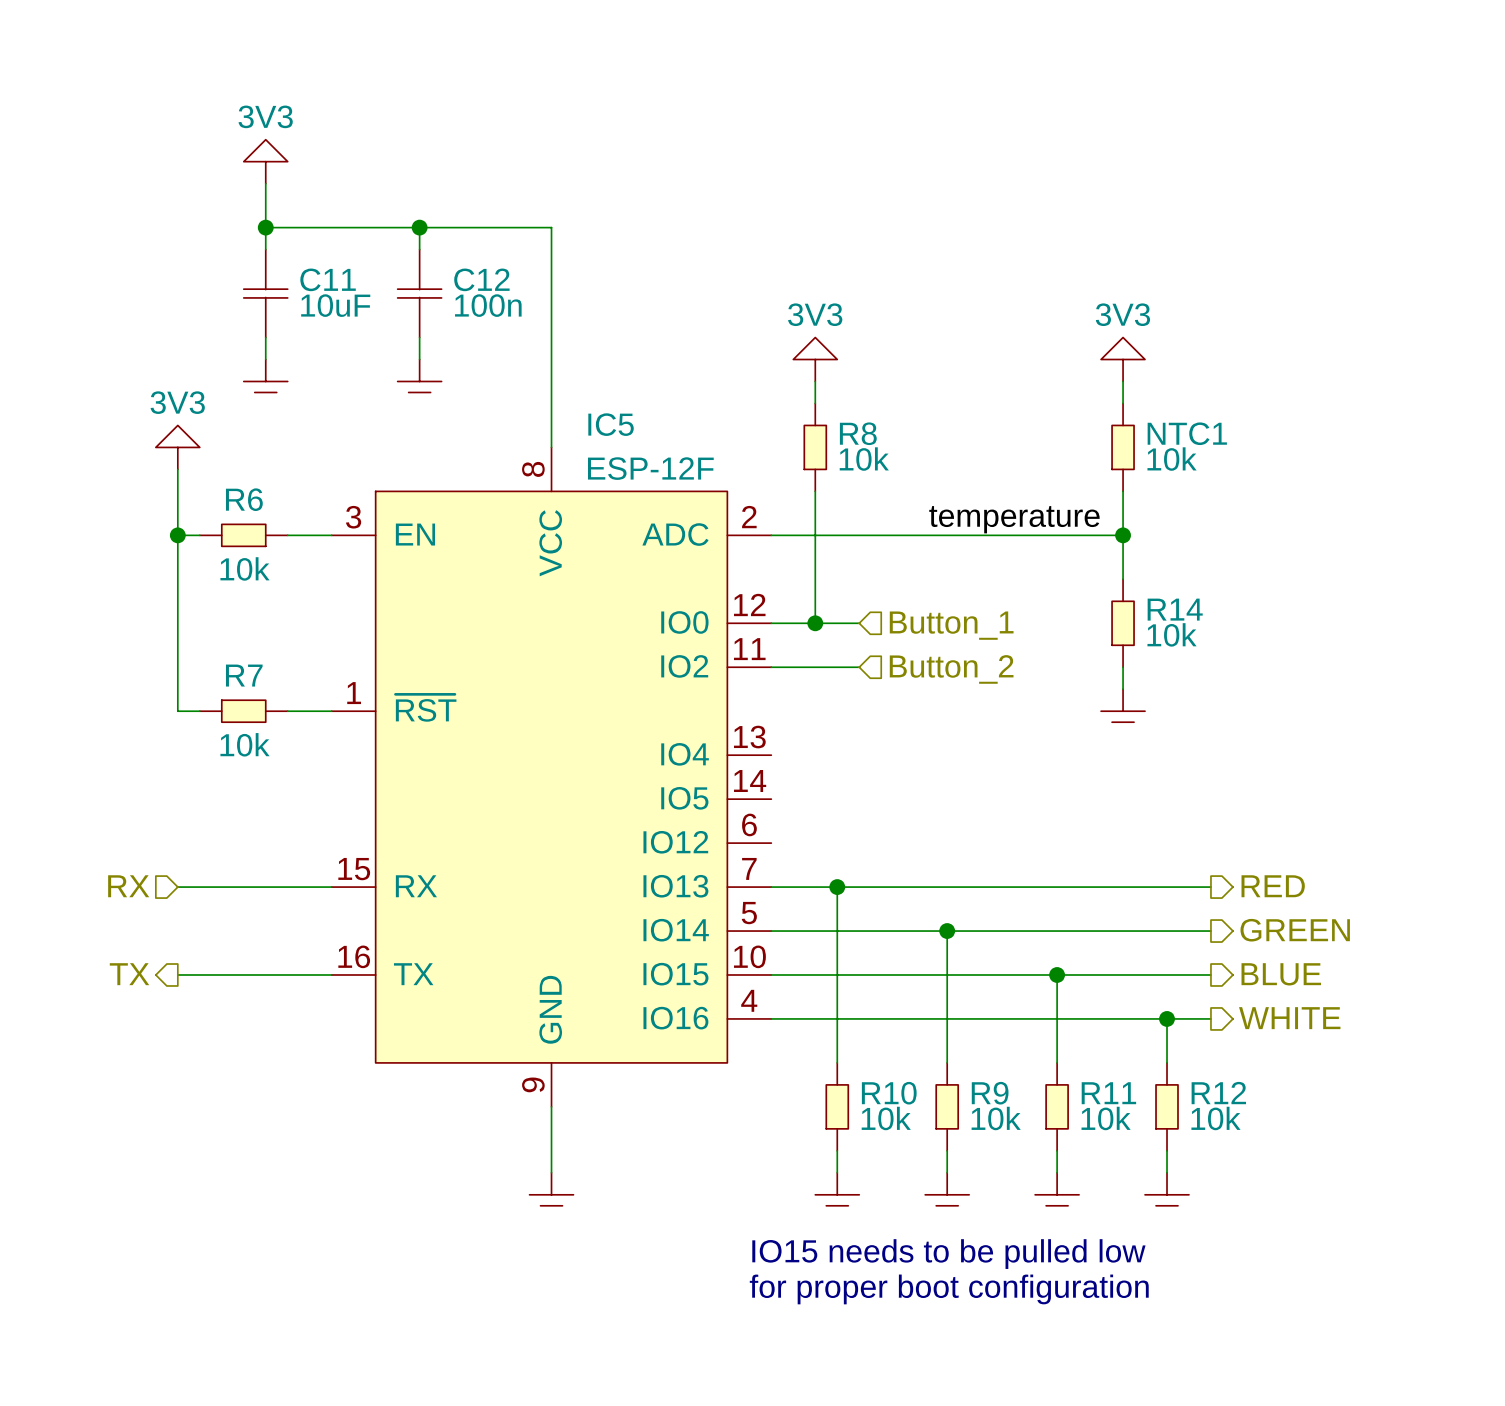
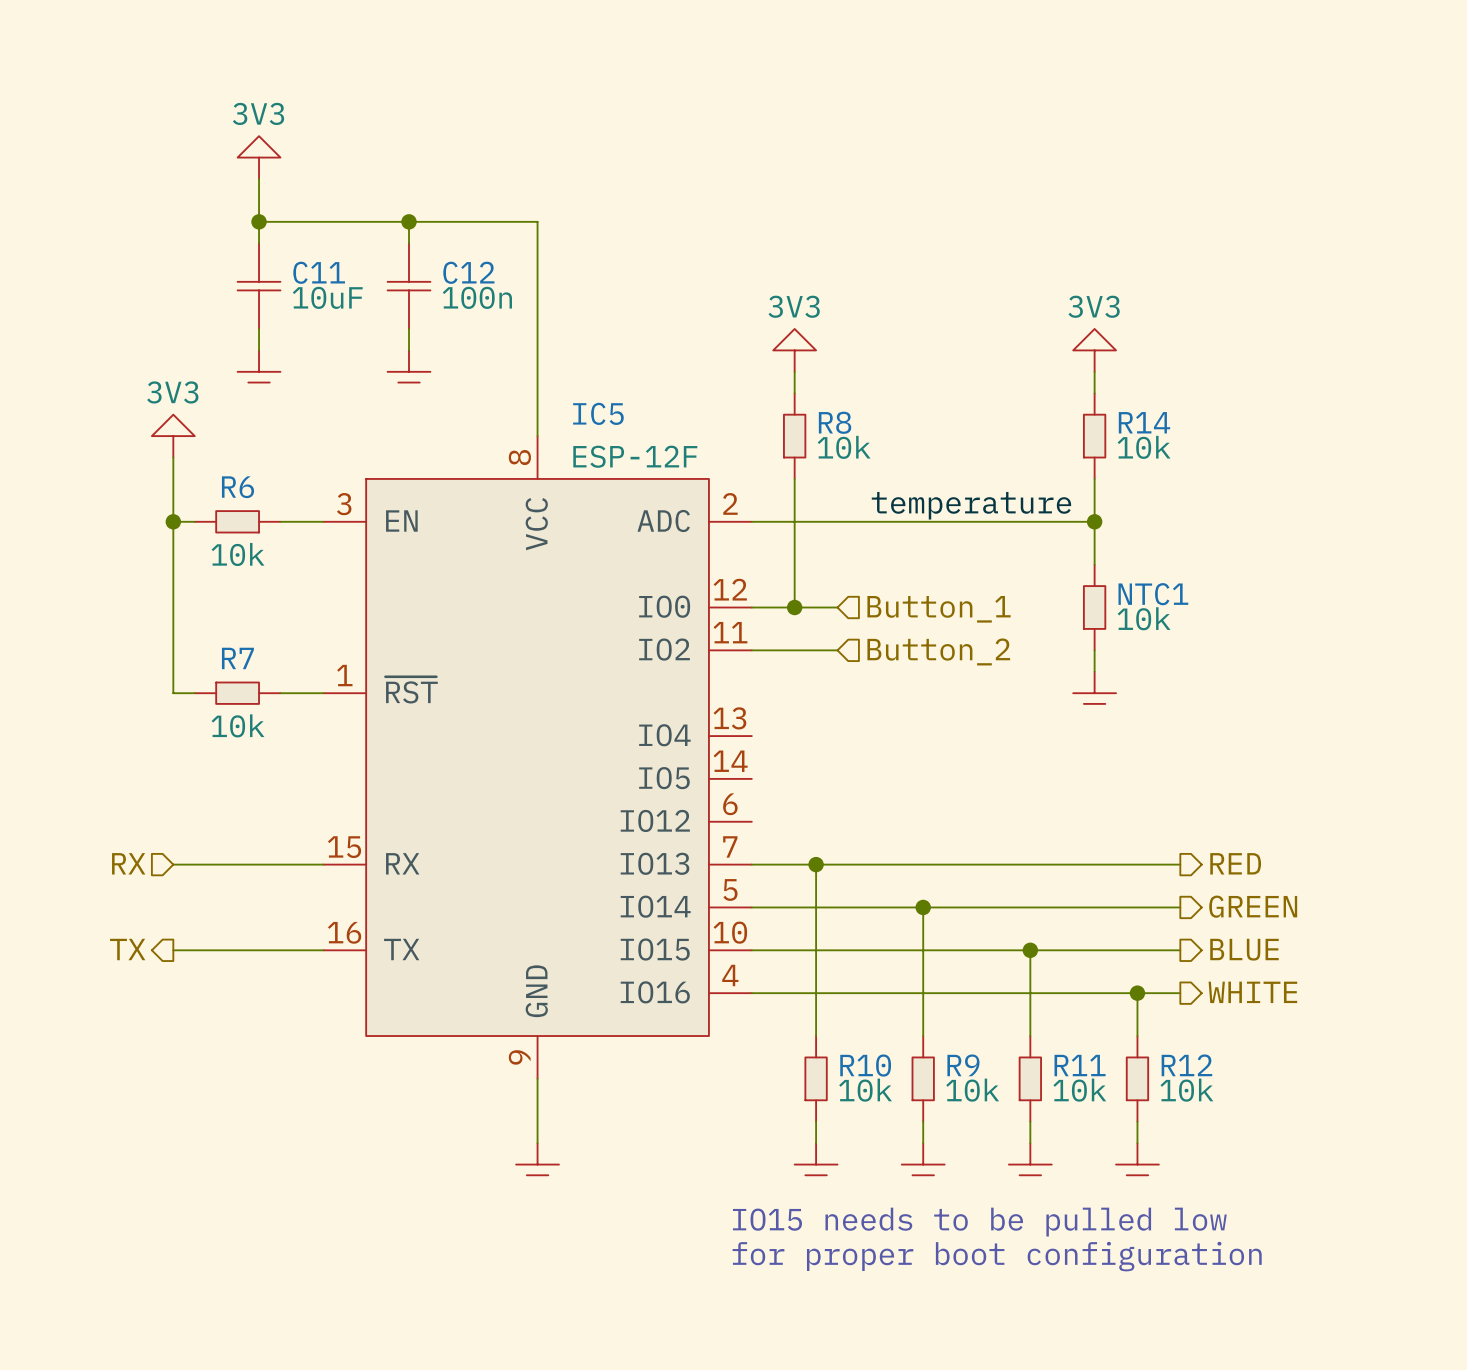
NTC1 name: NTC1 (1187, 433) -> R14 (1144, 422)
R14 name: R14 (1175, 609) -> NTC1 (1153, 594)

